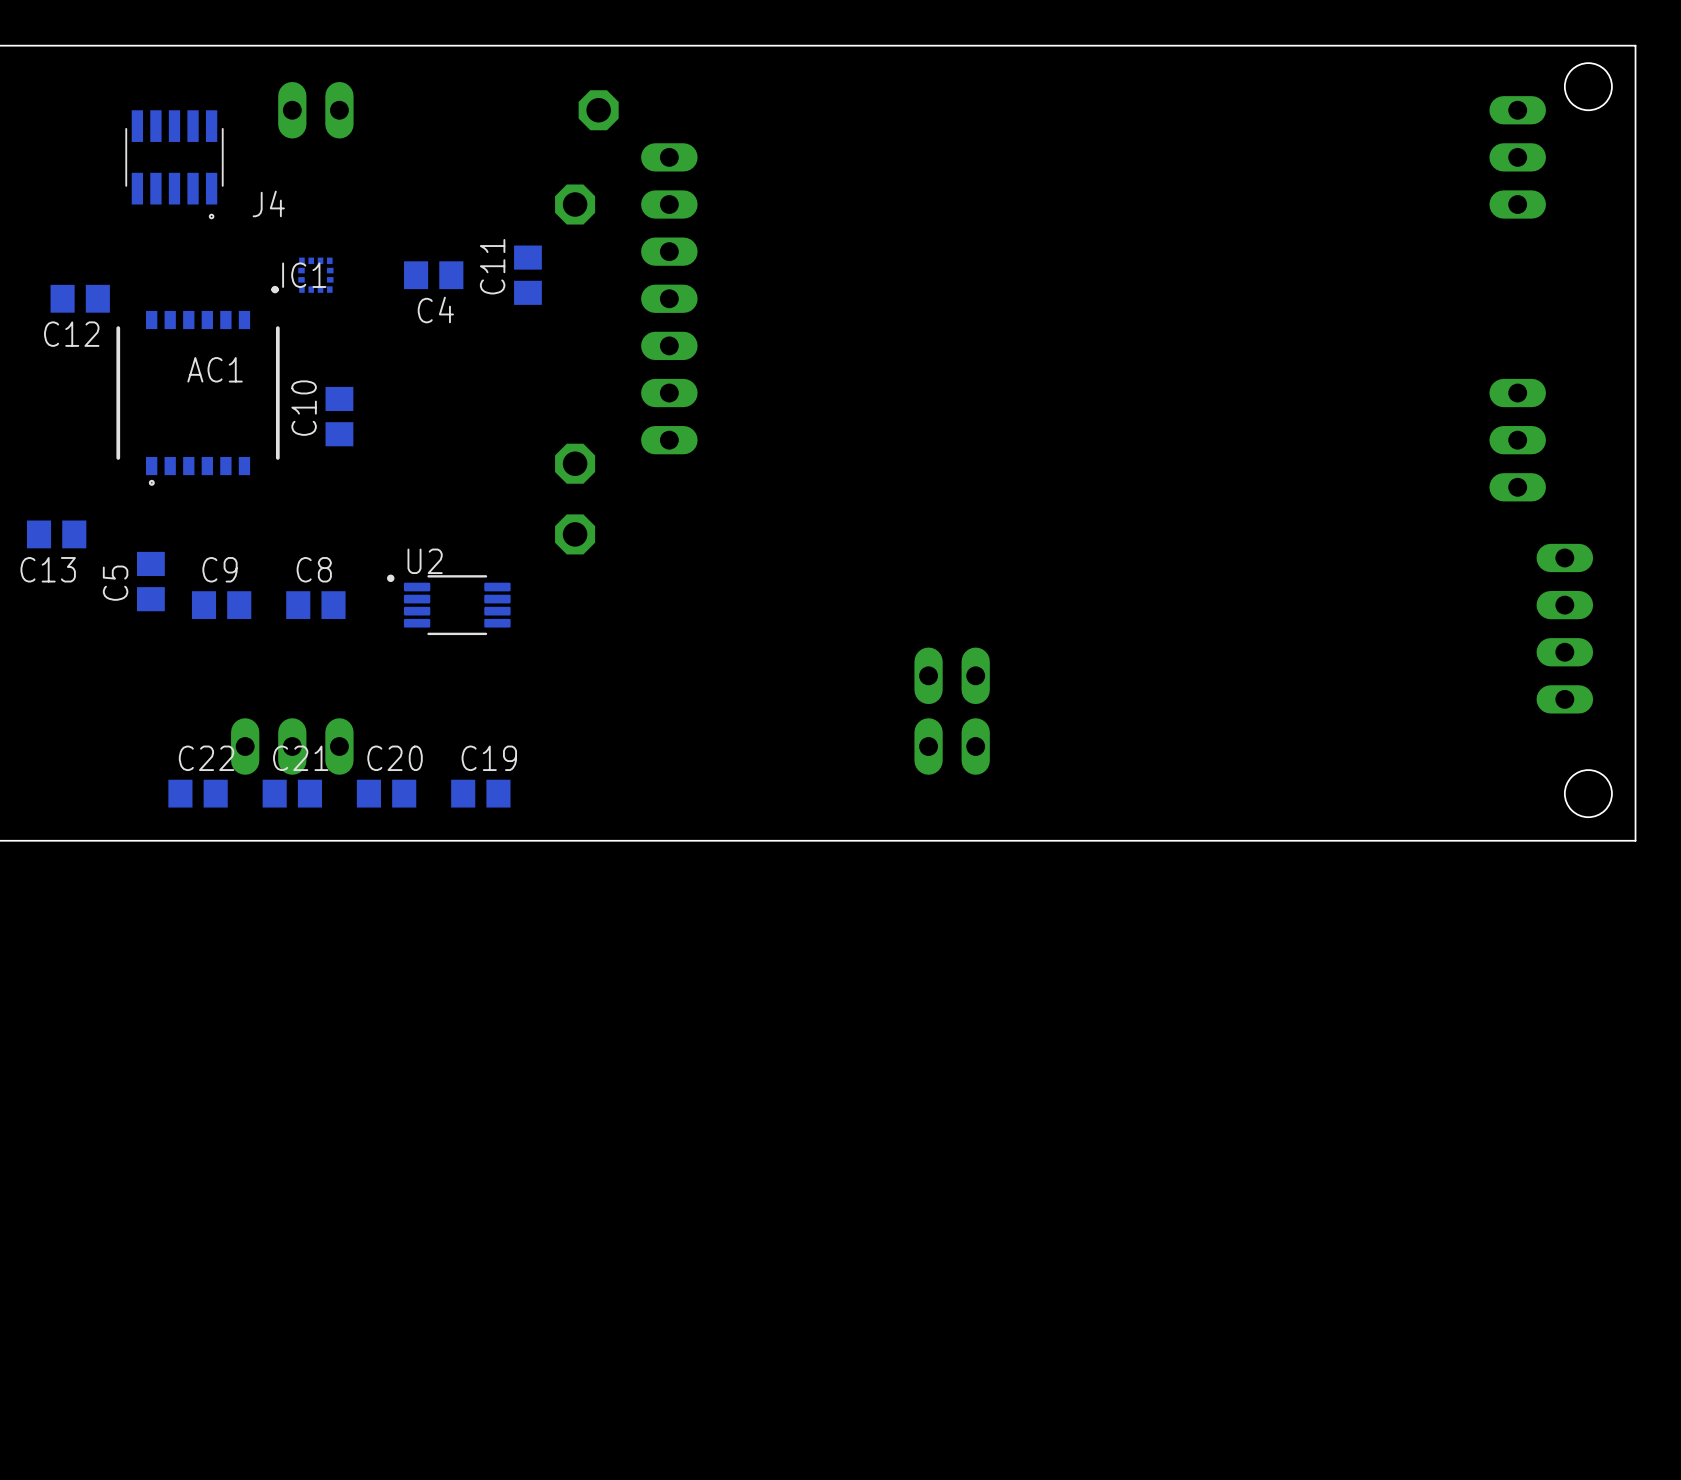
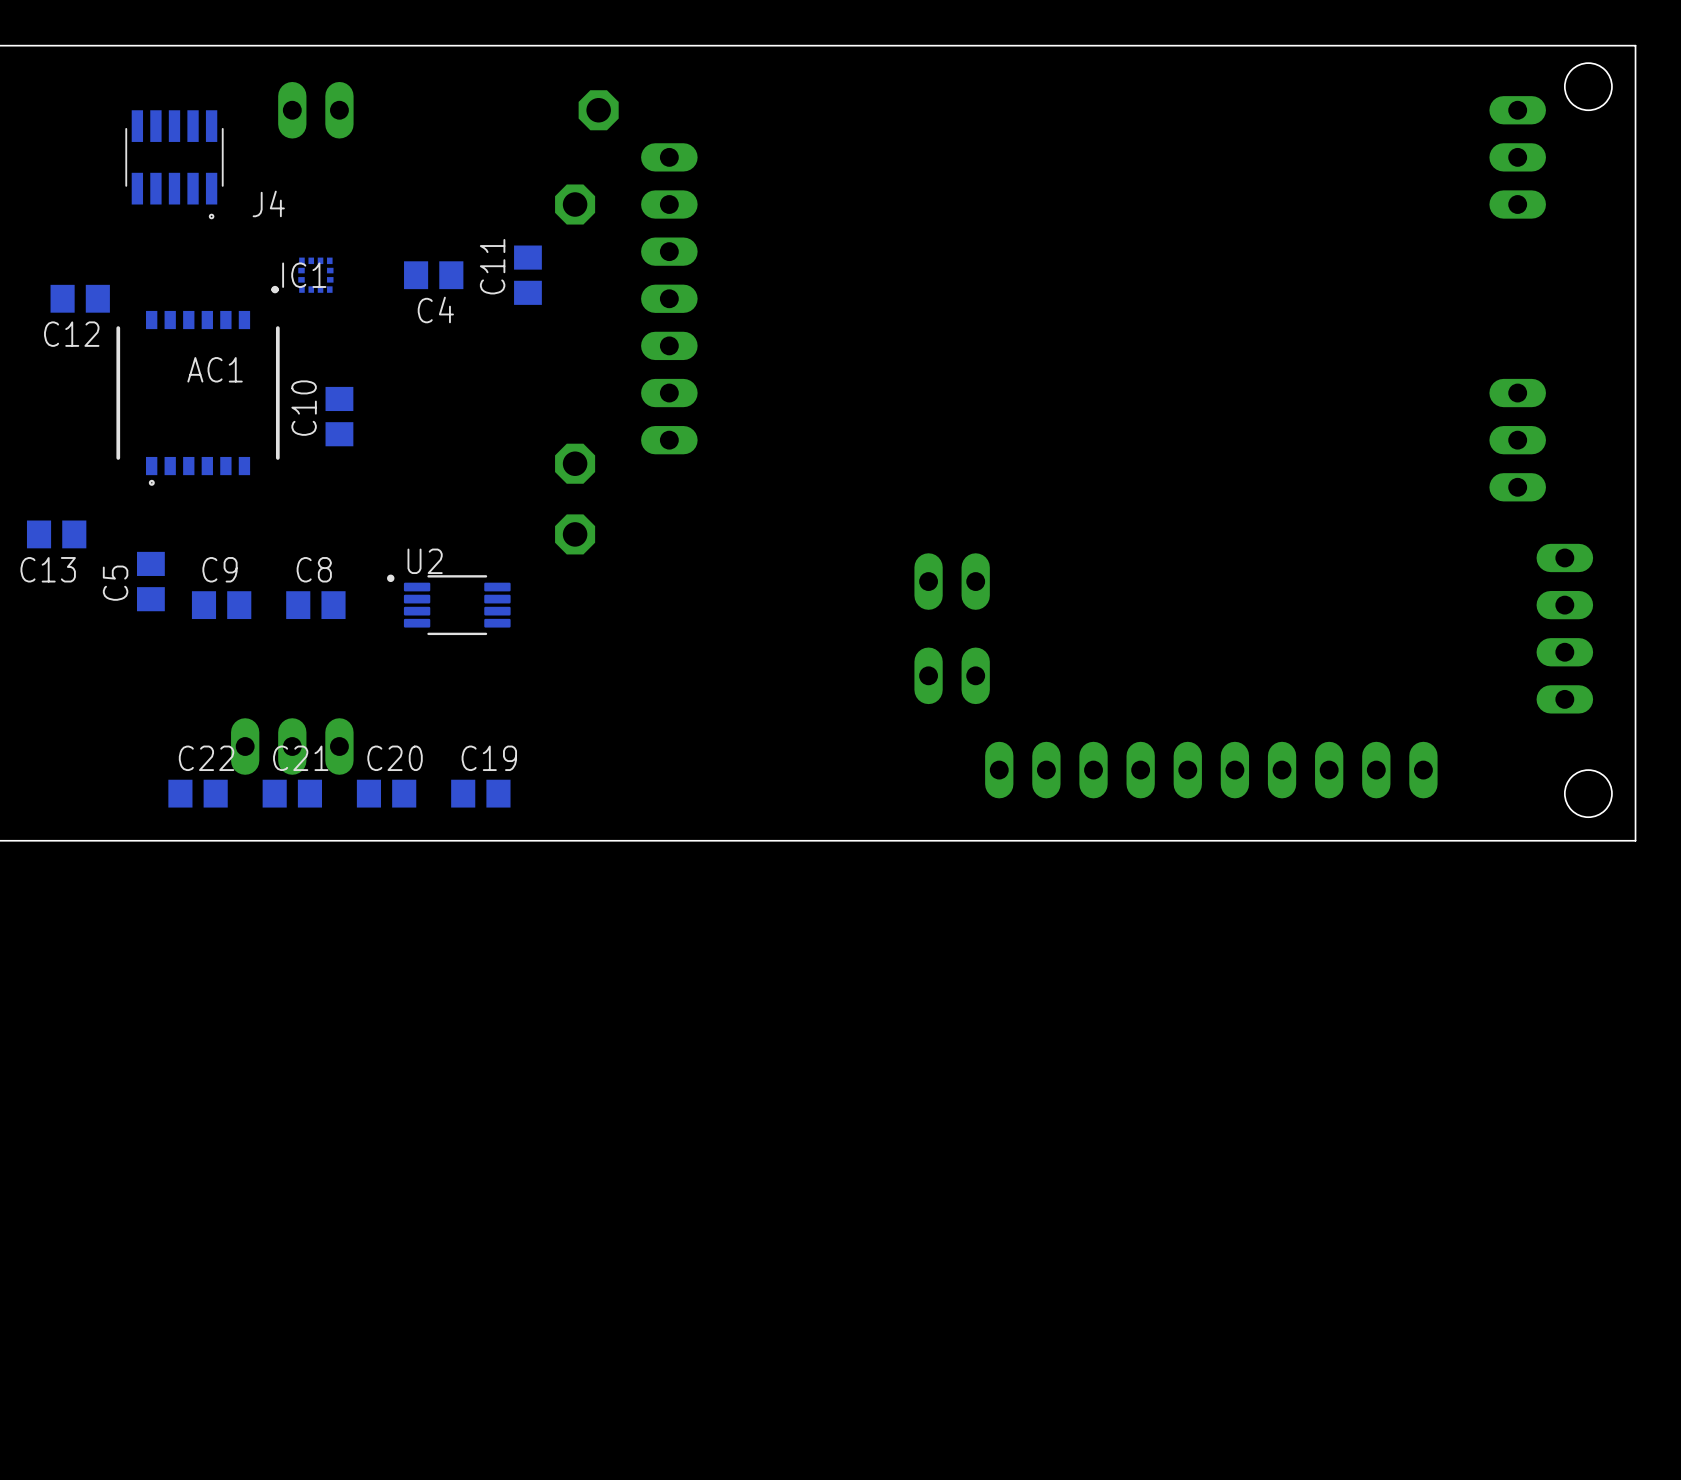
part position: (952, 746) -> (952, 581)
part: none -> (1211, 770)

